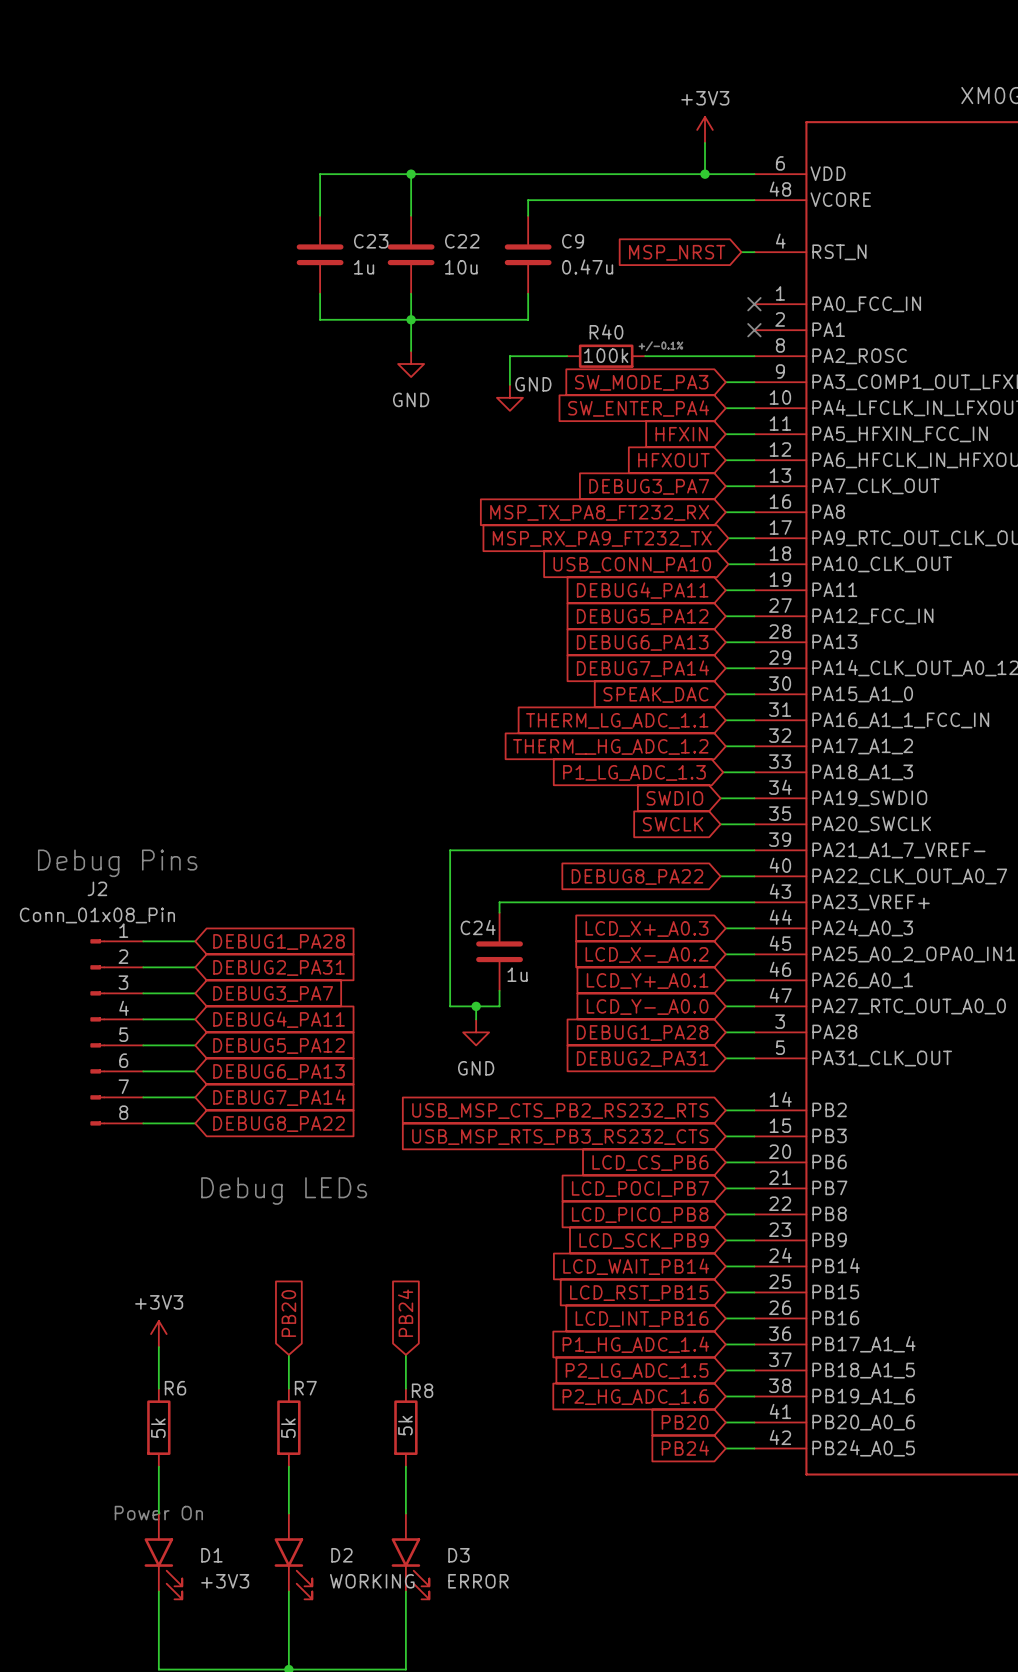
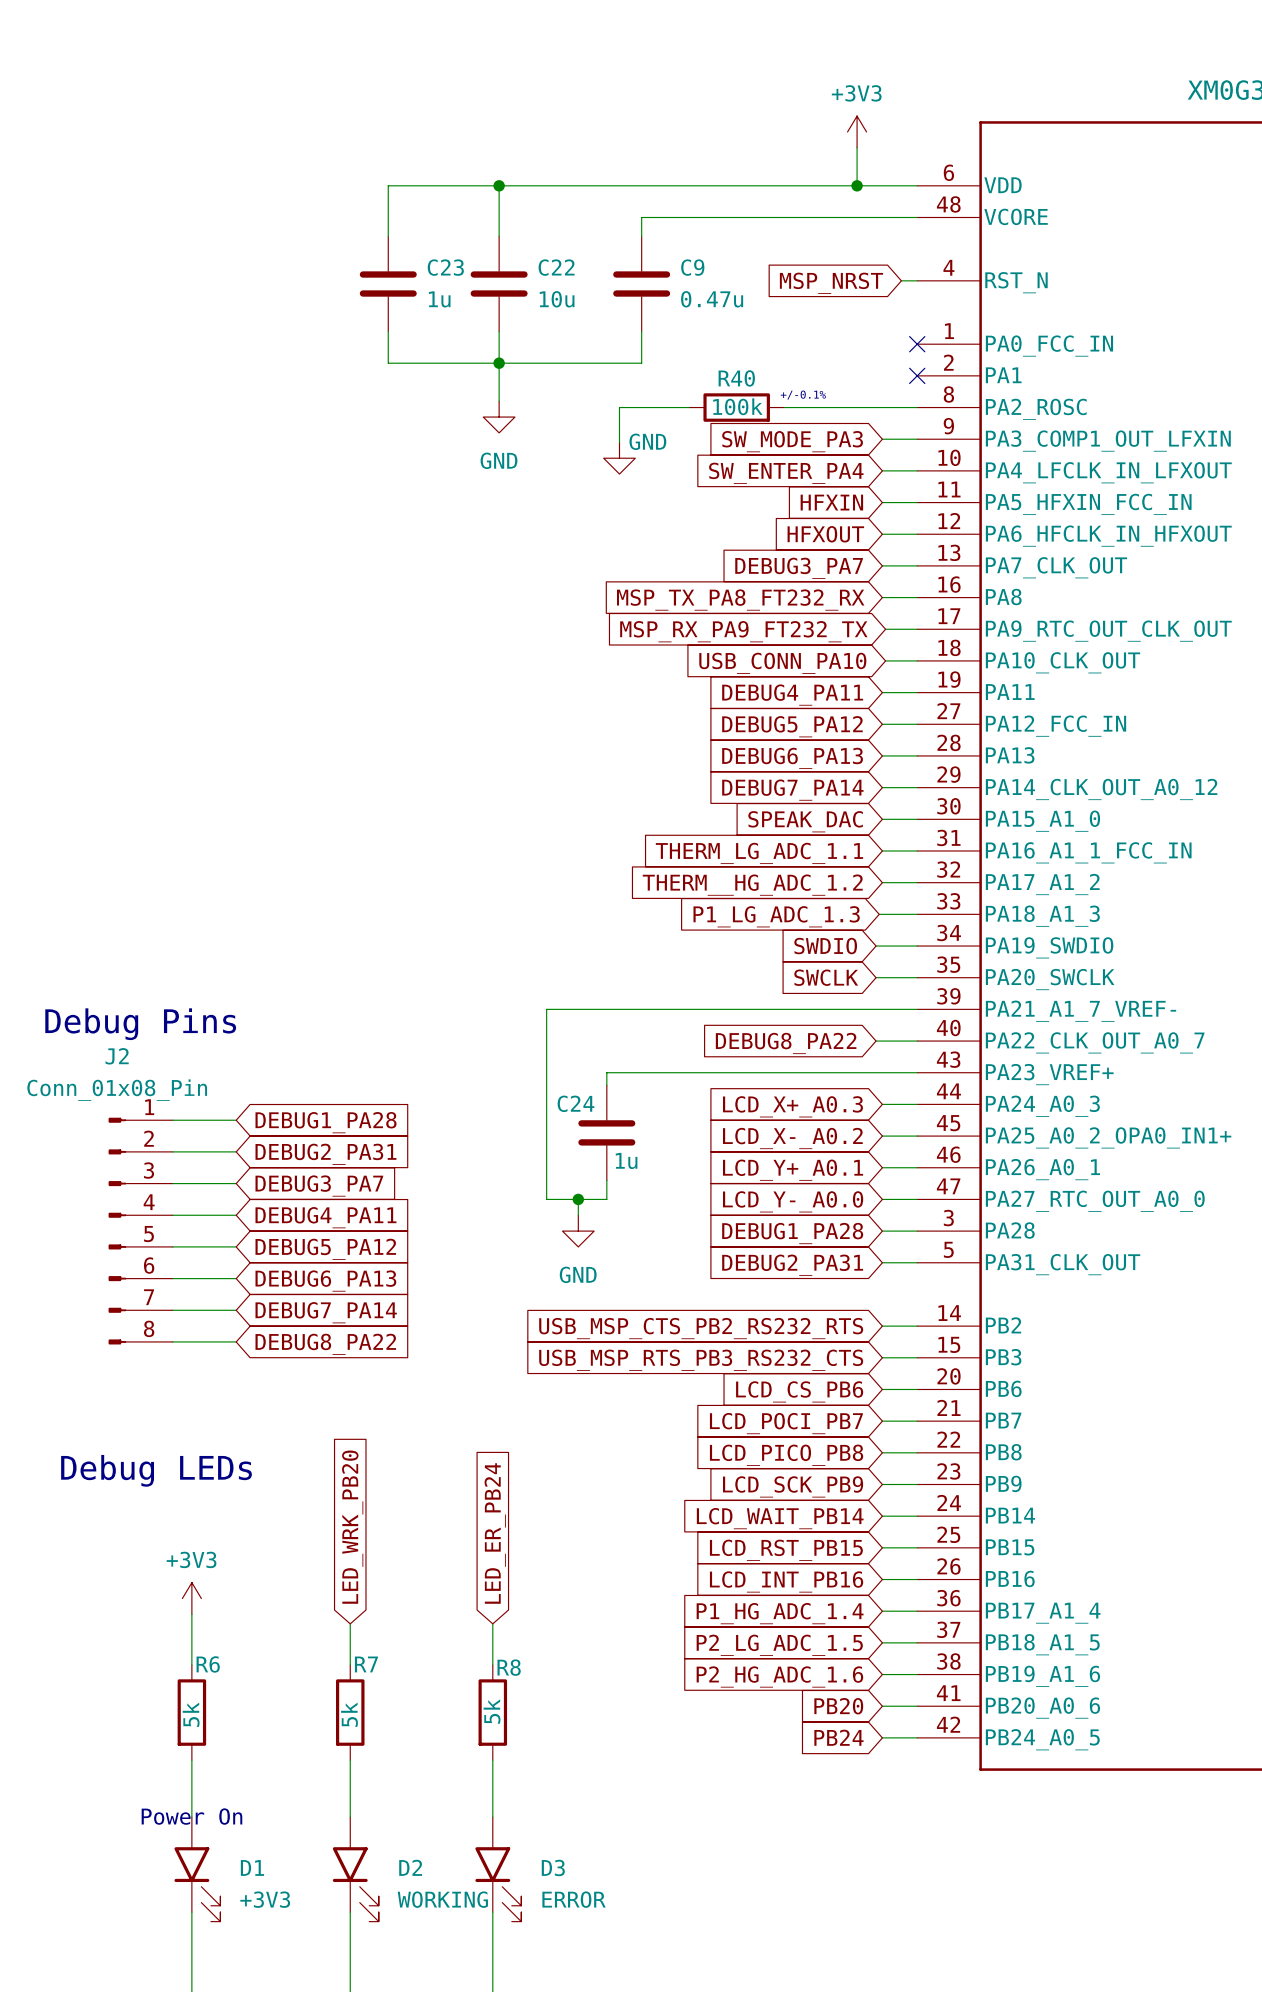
text position: Debug LEDs (284, 1190) -> Debug LEDs (156, 1470)
global label: PB20 (288, 1313) -> LED_WRK_PB20 (352, 1527)
global label: PB24 (405, 1313) -> LED_ER_PB24 (495, 1533)

